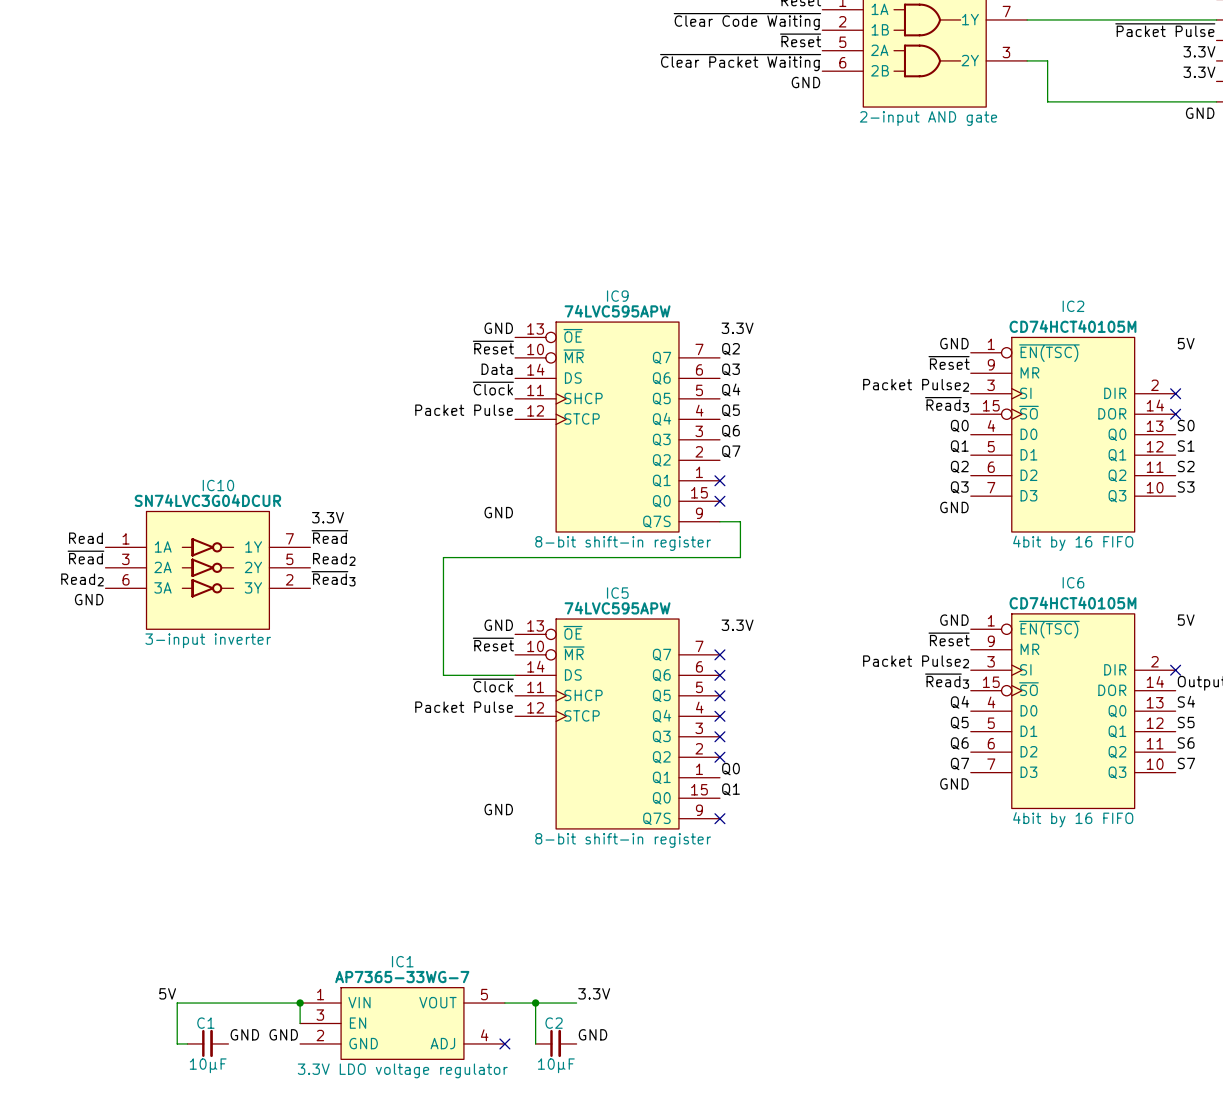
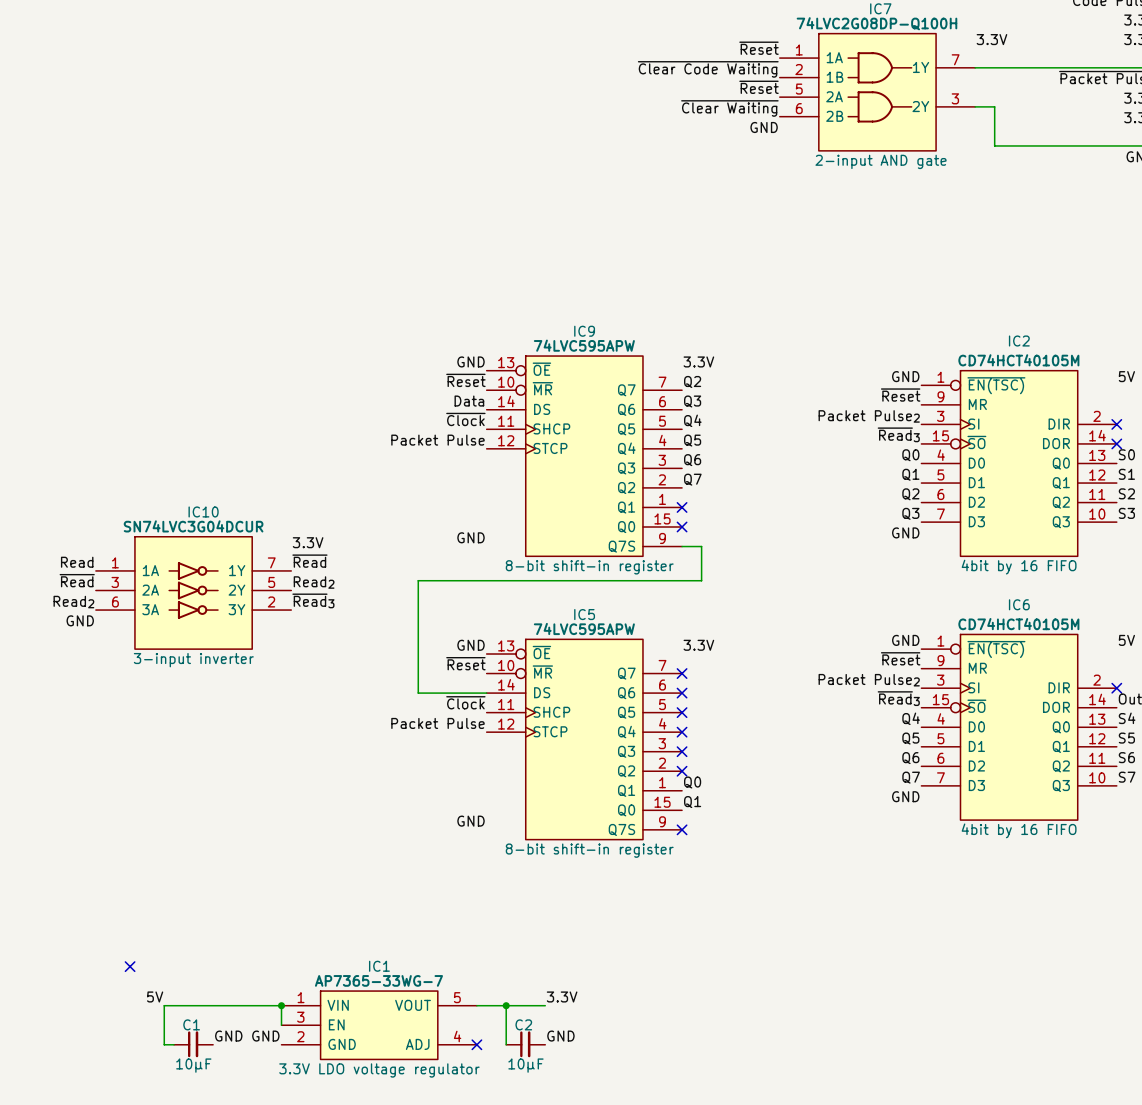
label: ~{Clear Packet Waiting} (740, 62) -> ~{Clear Waiting} (729, 108)
no-connect mark: none -> (130, 966)

